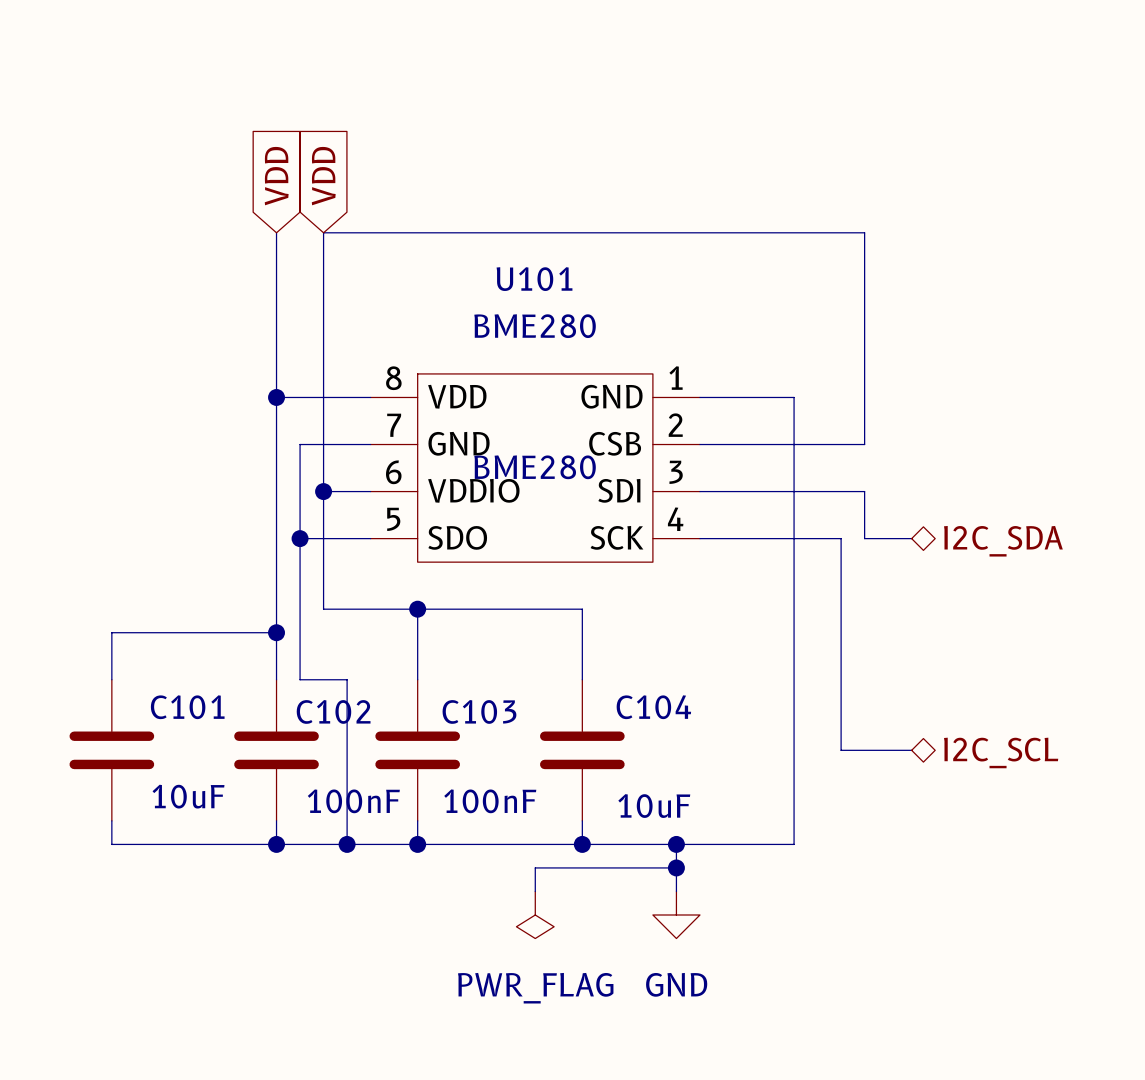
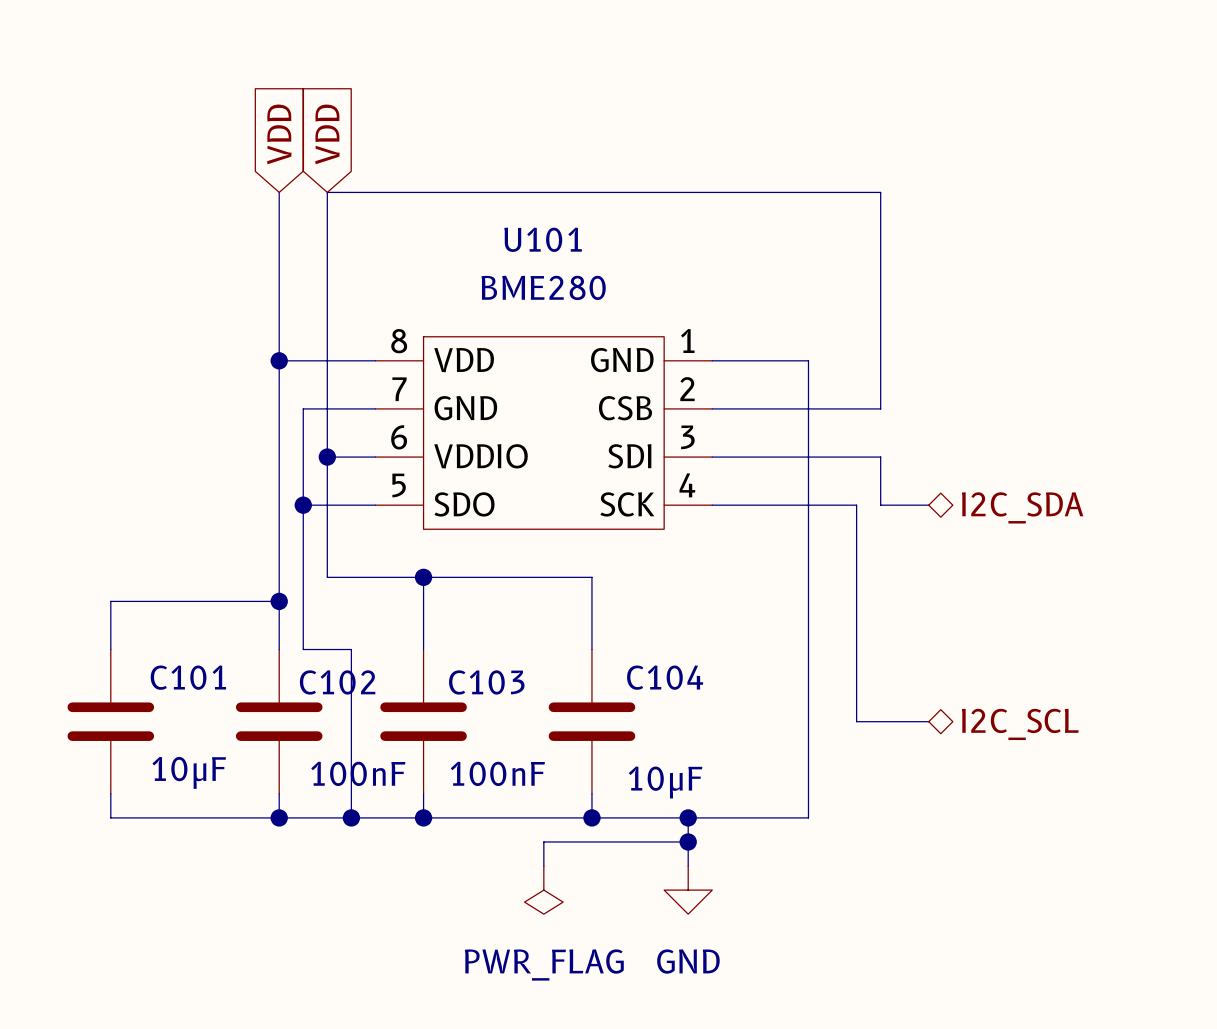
U101 value: BME280 (535, 467) -> none
C101 value: 10uF (188, 796) -> 10μF (189, 772)
C104 value: 10uF (654, 806) -> 10μF (665, 782)

